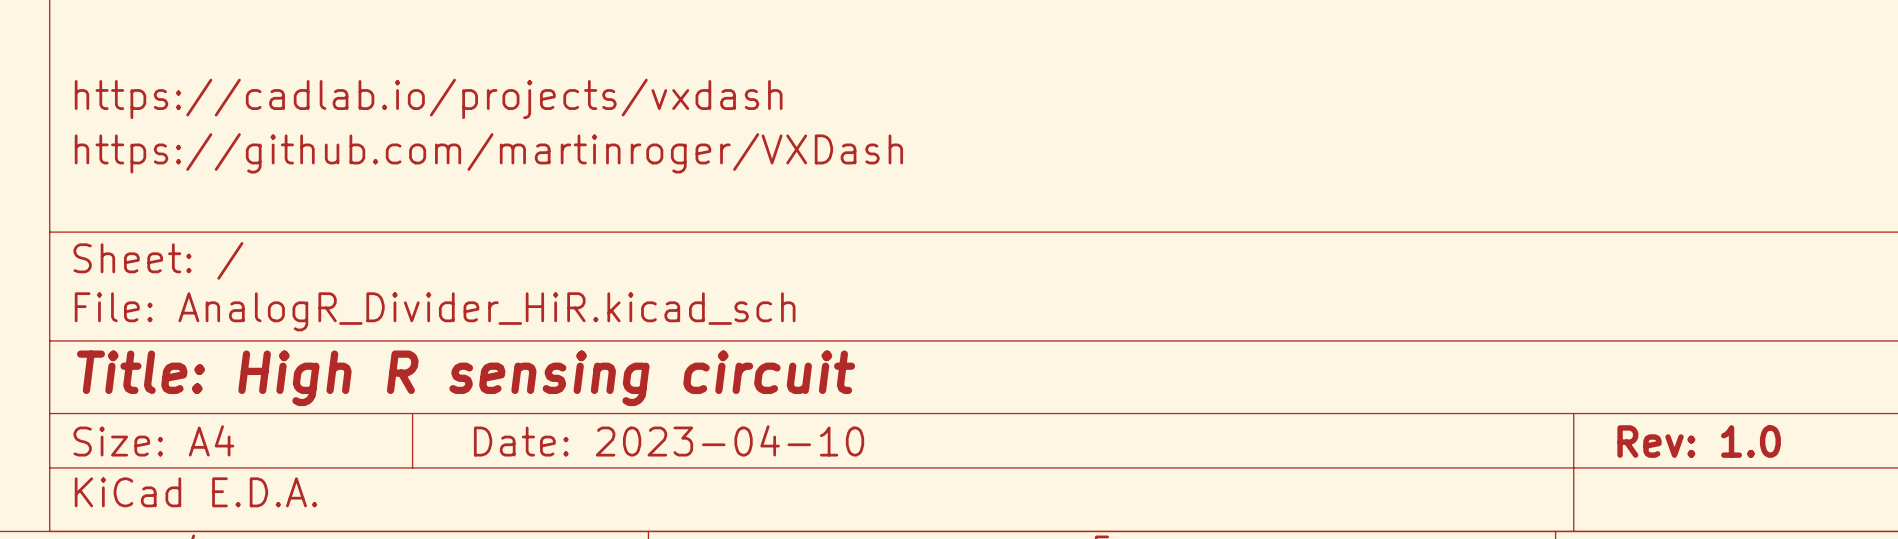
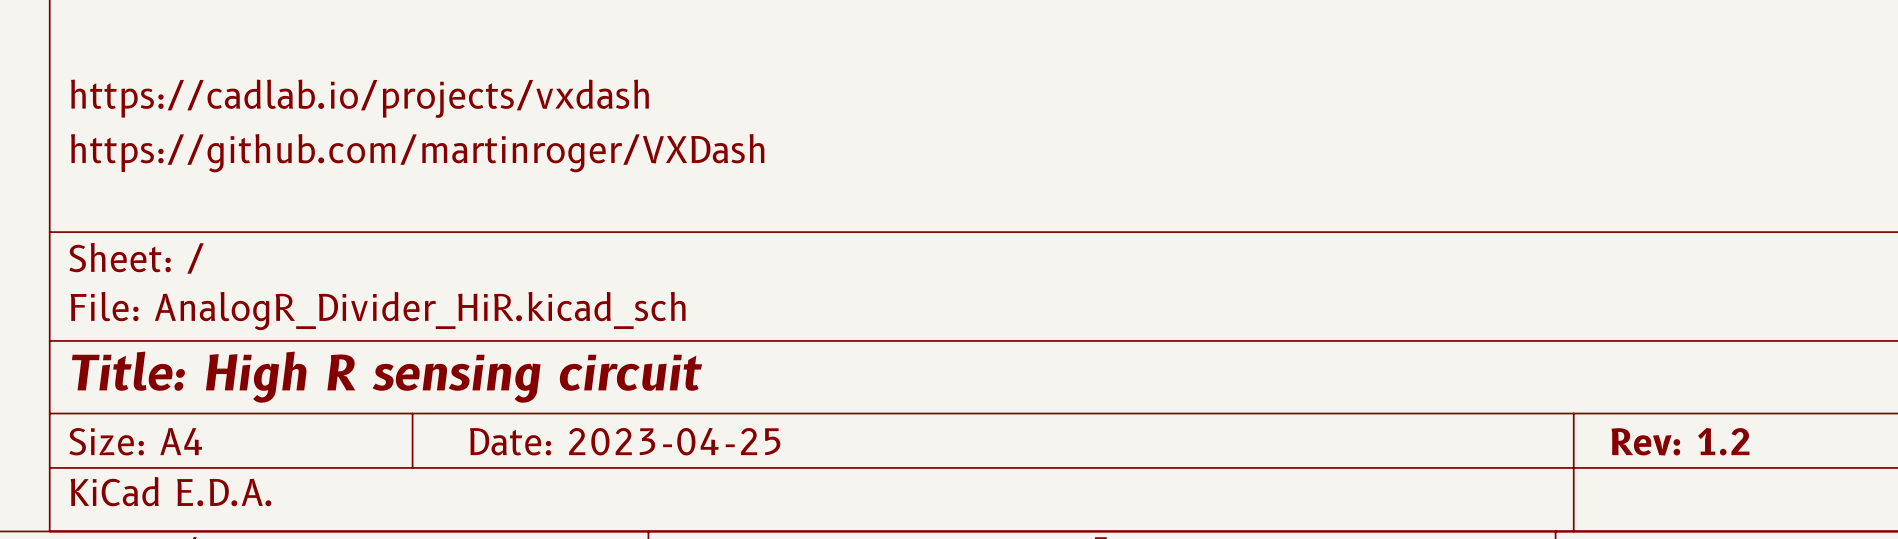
title block: Date: 2023-04-10 (669, 440) -> Date: 2023-04-25 (625, 441)
title block: Rev: 1.0 (1699, 441) -> Rev: 1.2 (1680, 441)

